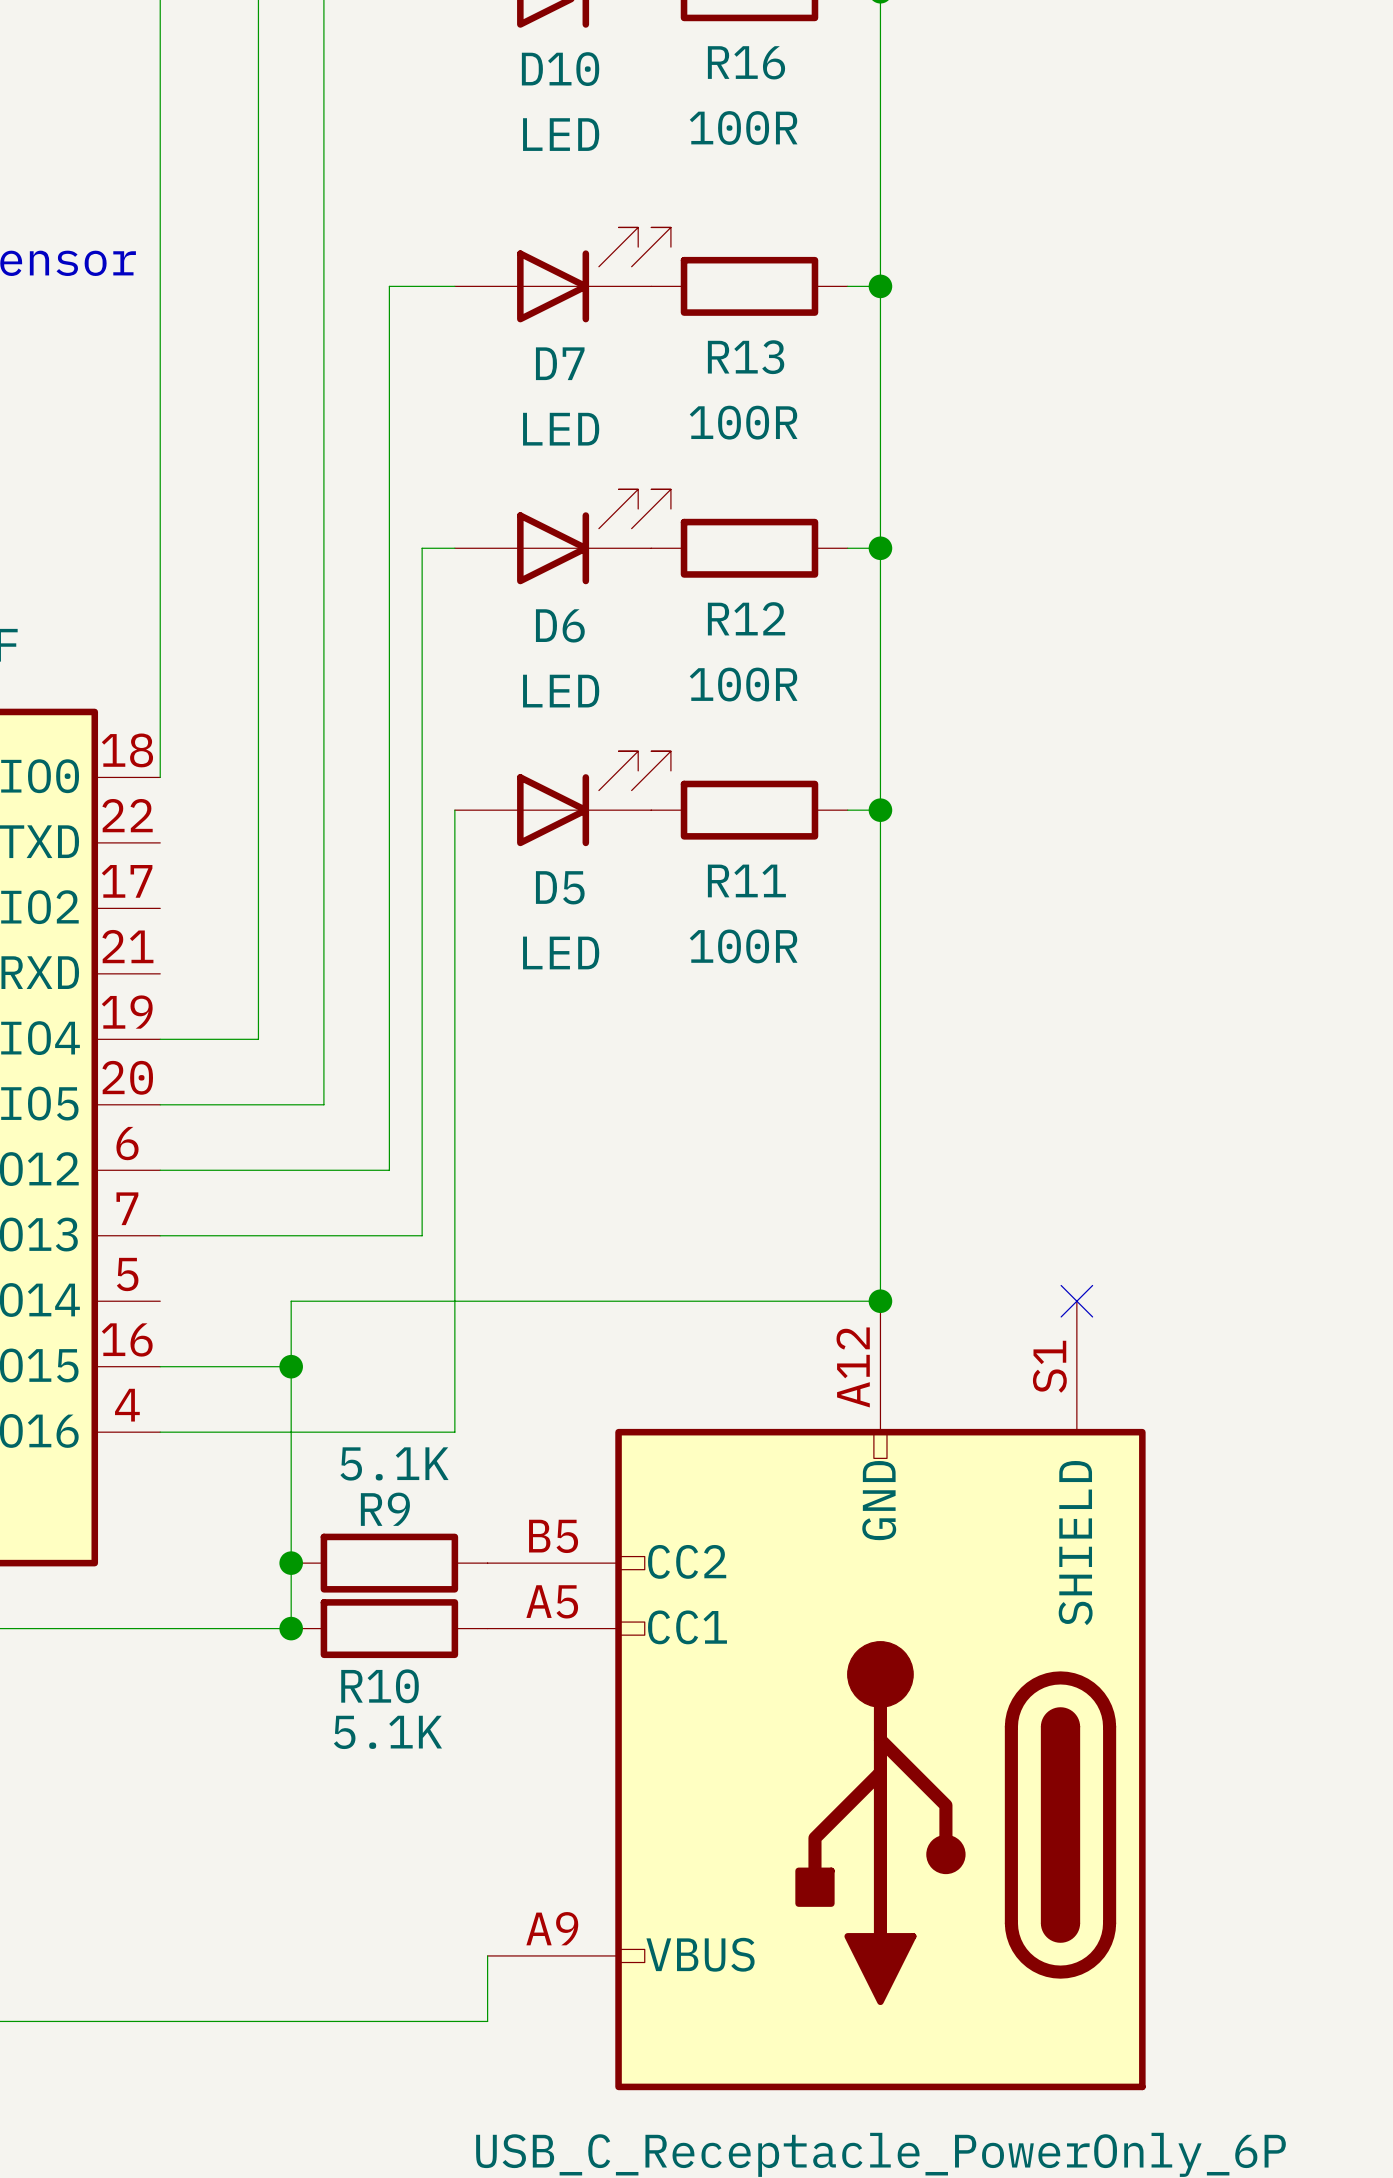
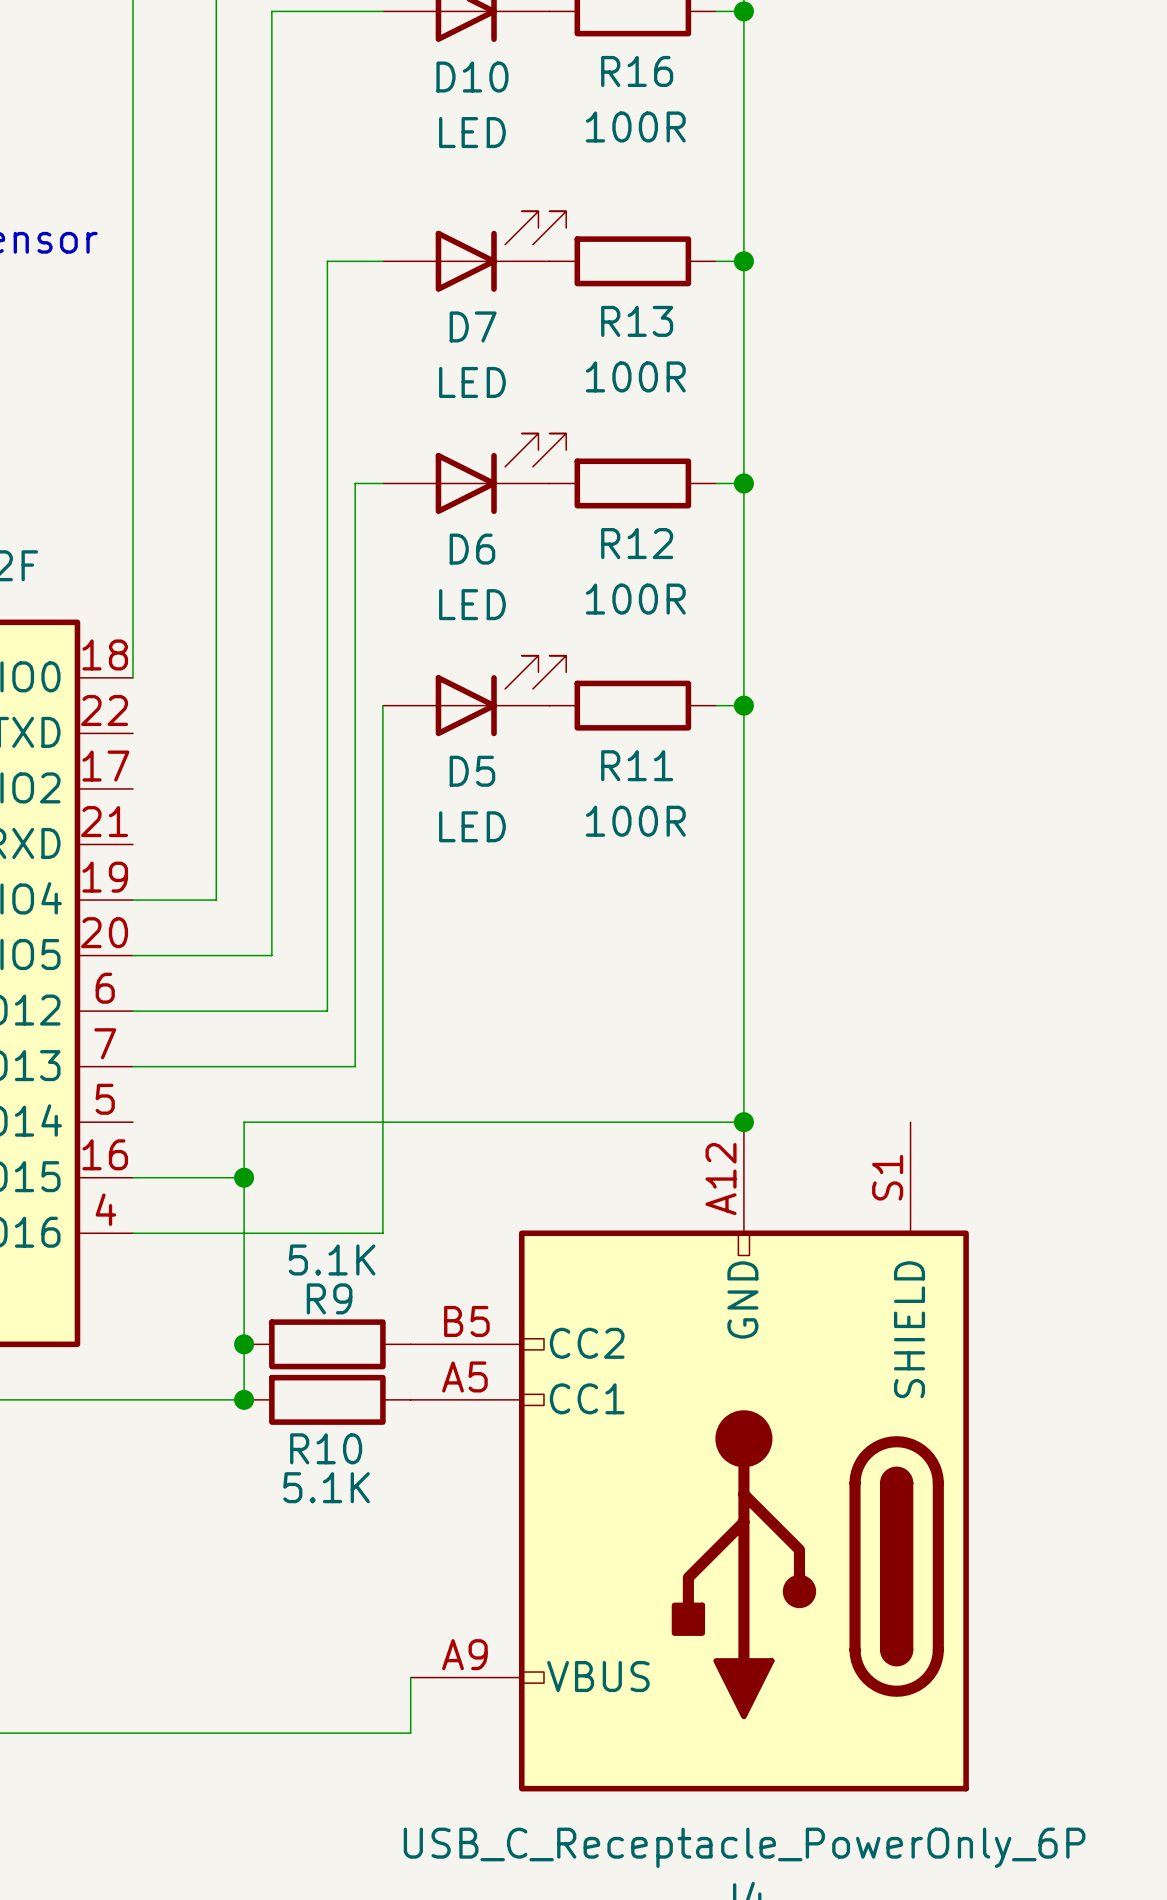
no-connect mark: (1076, 1301) -> none

